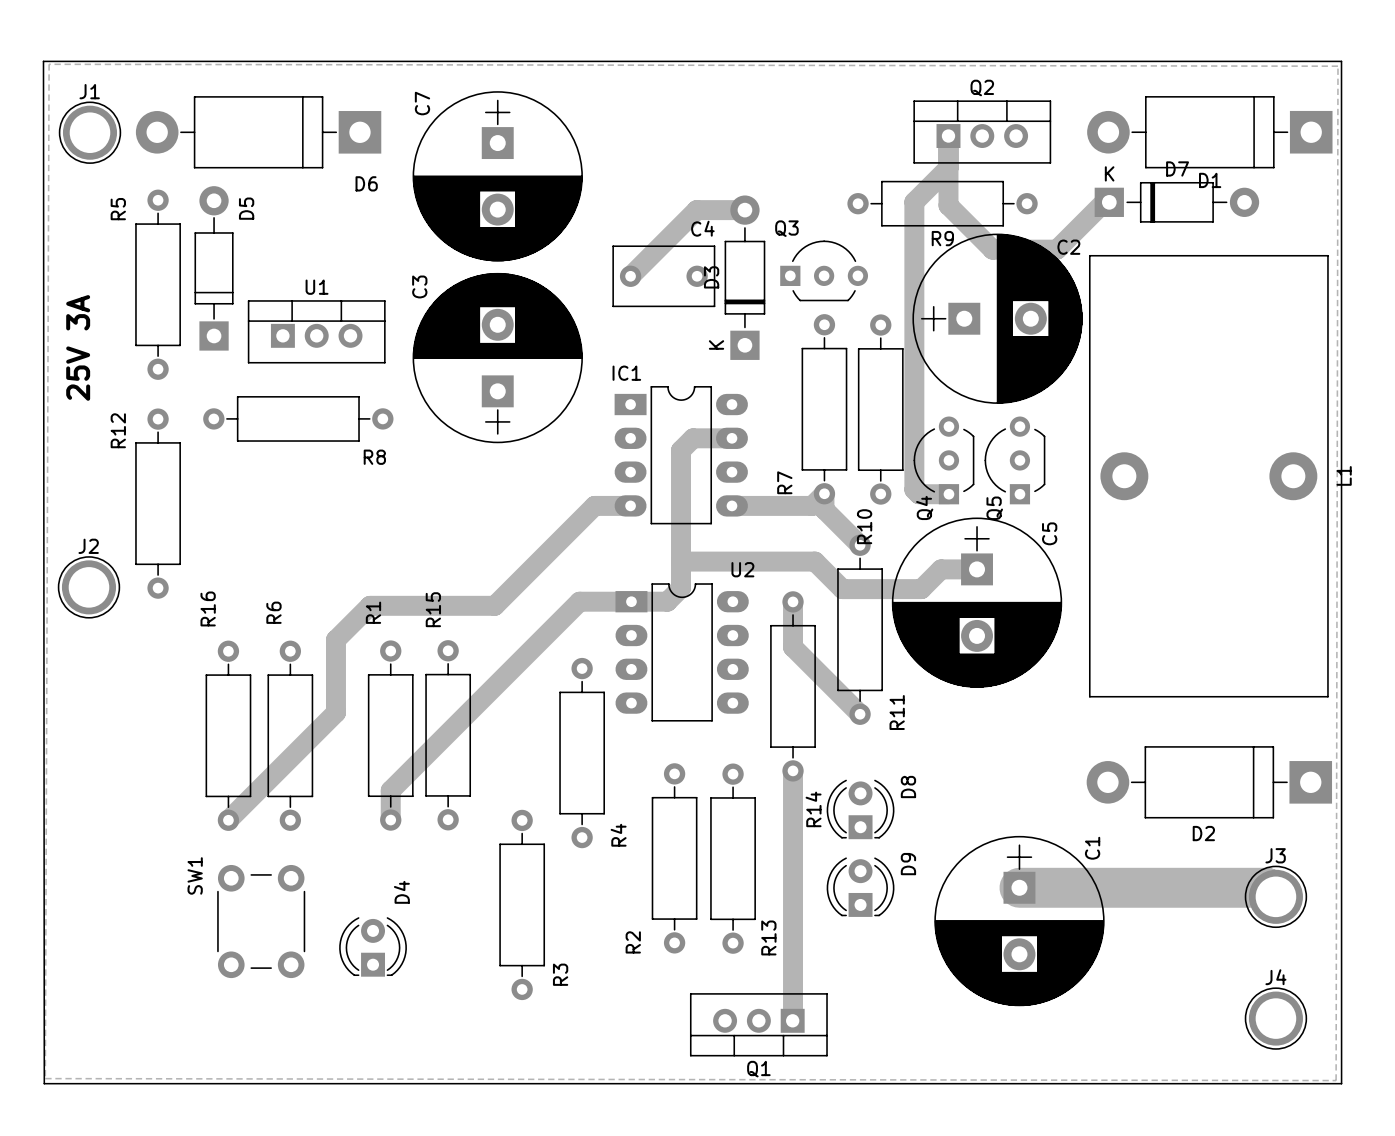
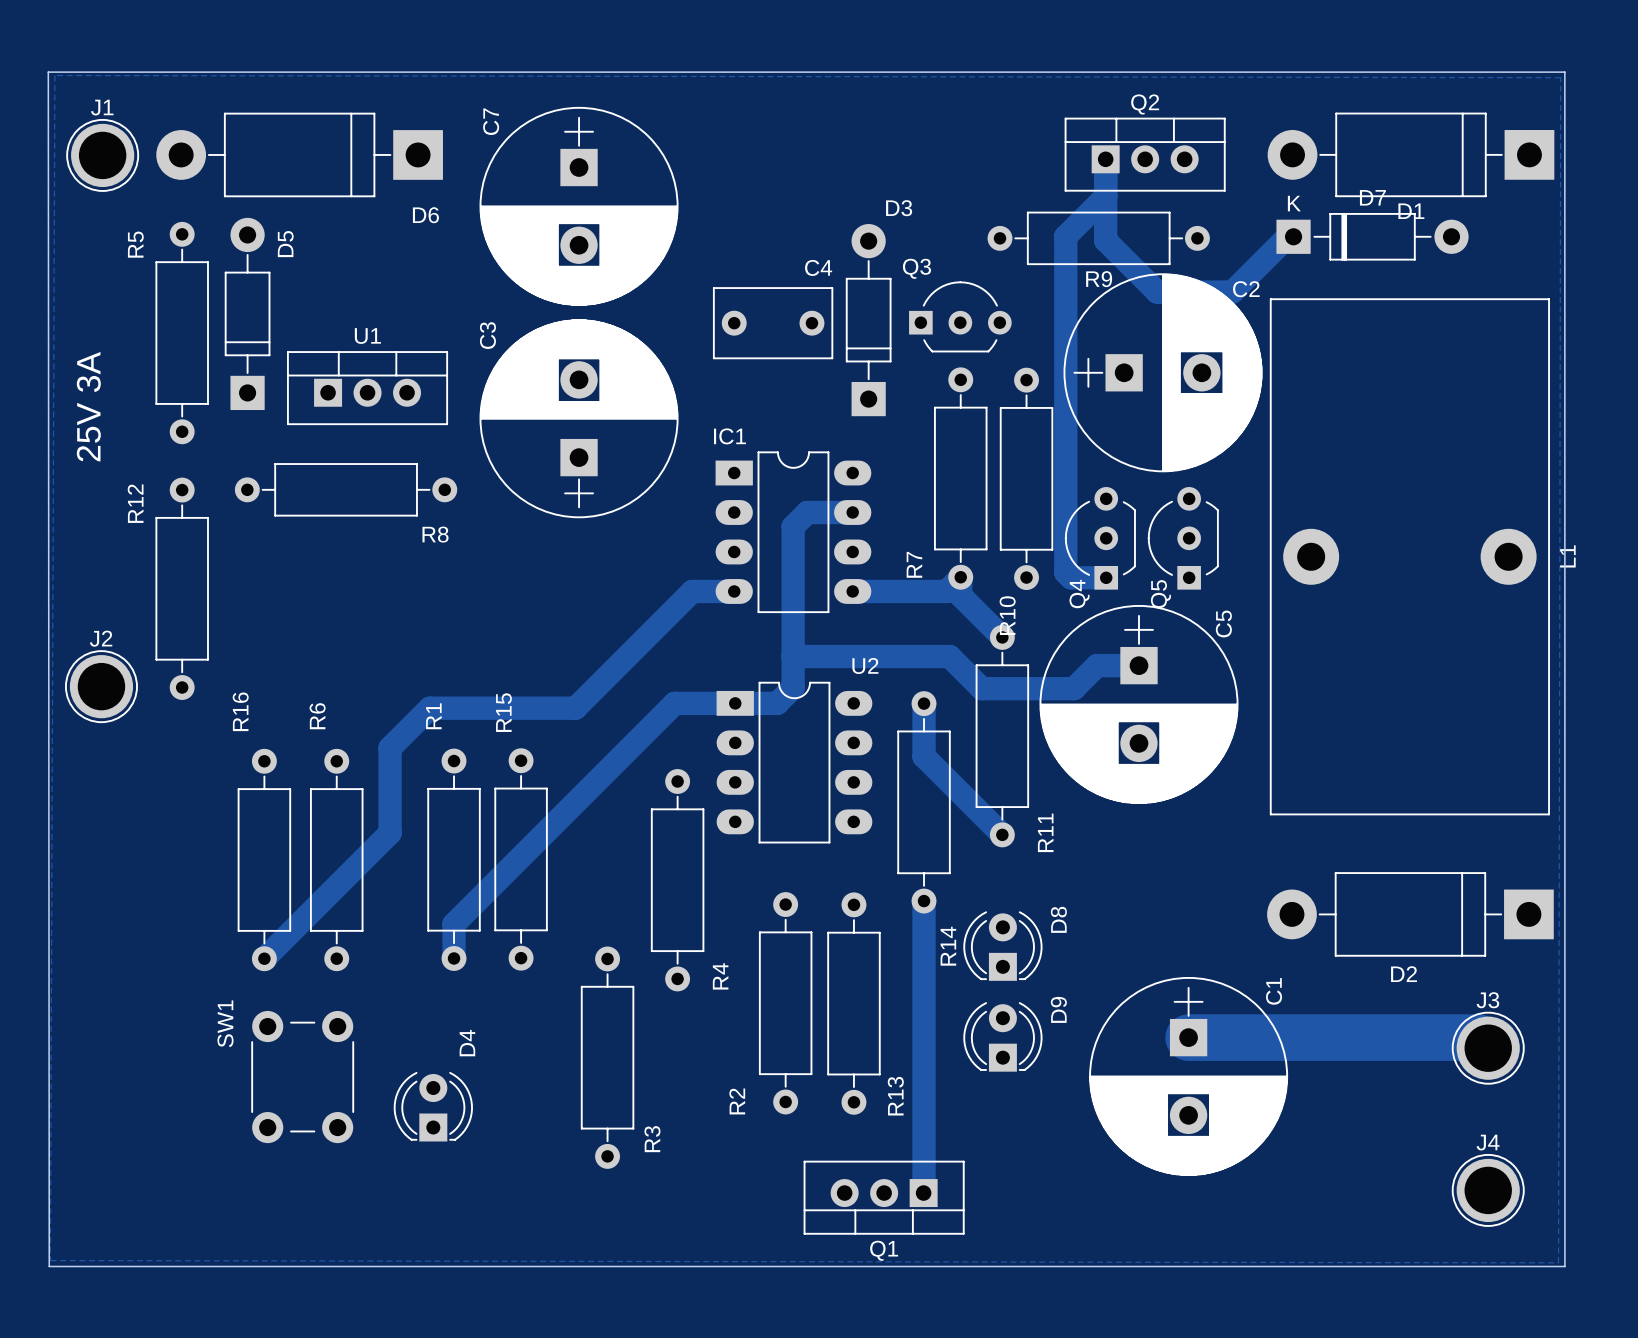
D3 footprint: [724, 195, 766, 360] -> [845, 224, 892, 417]
track: (744, 210) (696, 210) (630, 276) -> none
D3 name position: D3 (711, 277) -> D3 (899, 208)

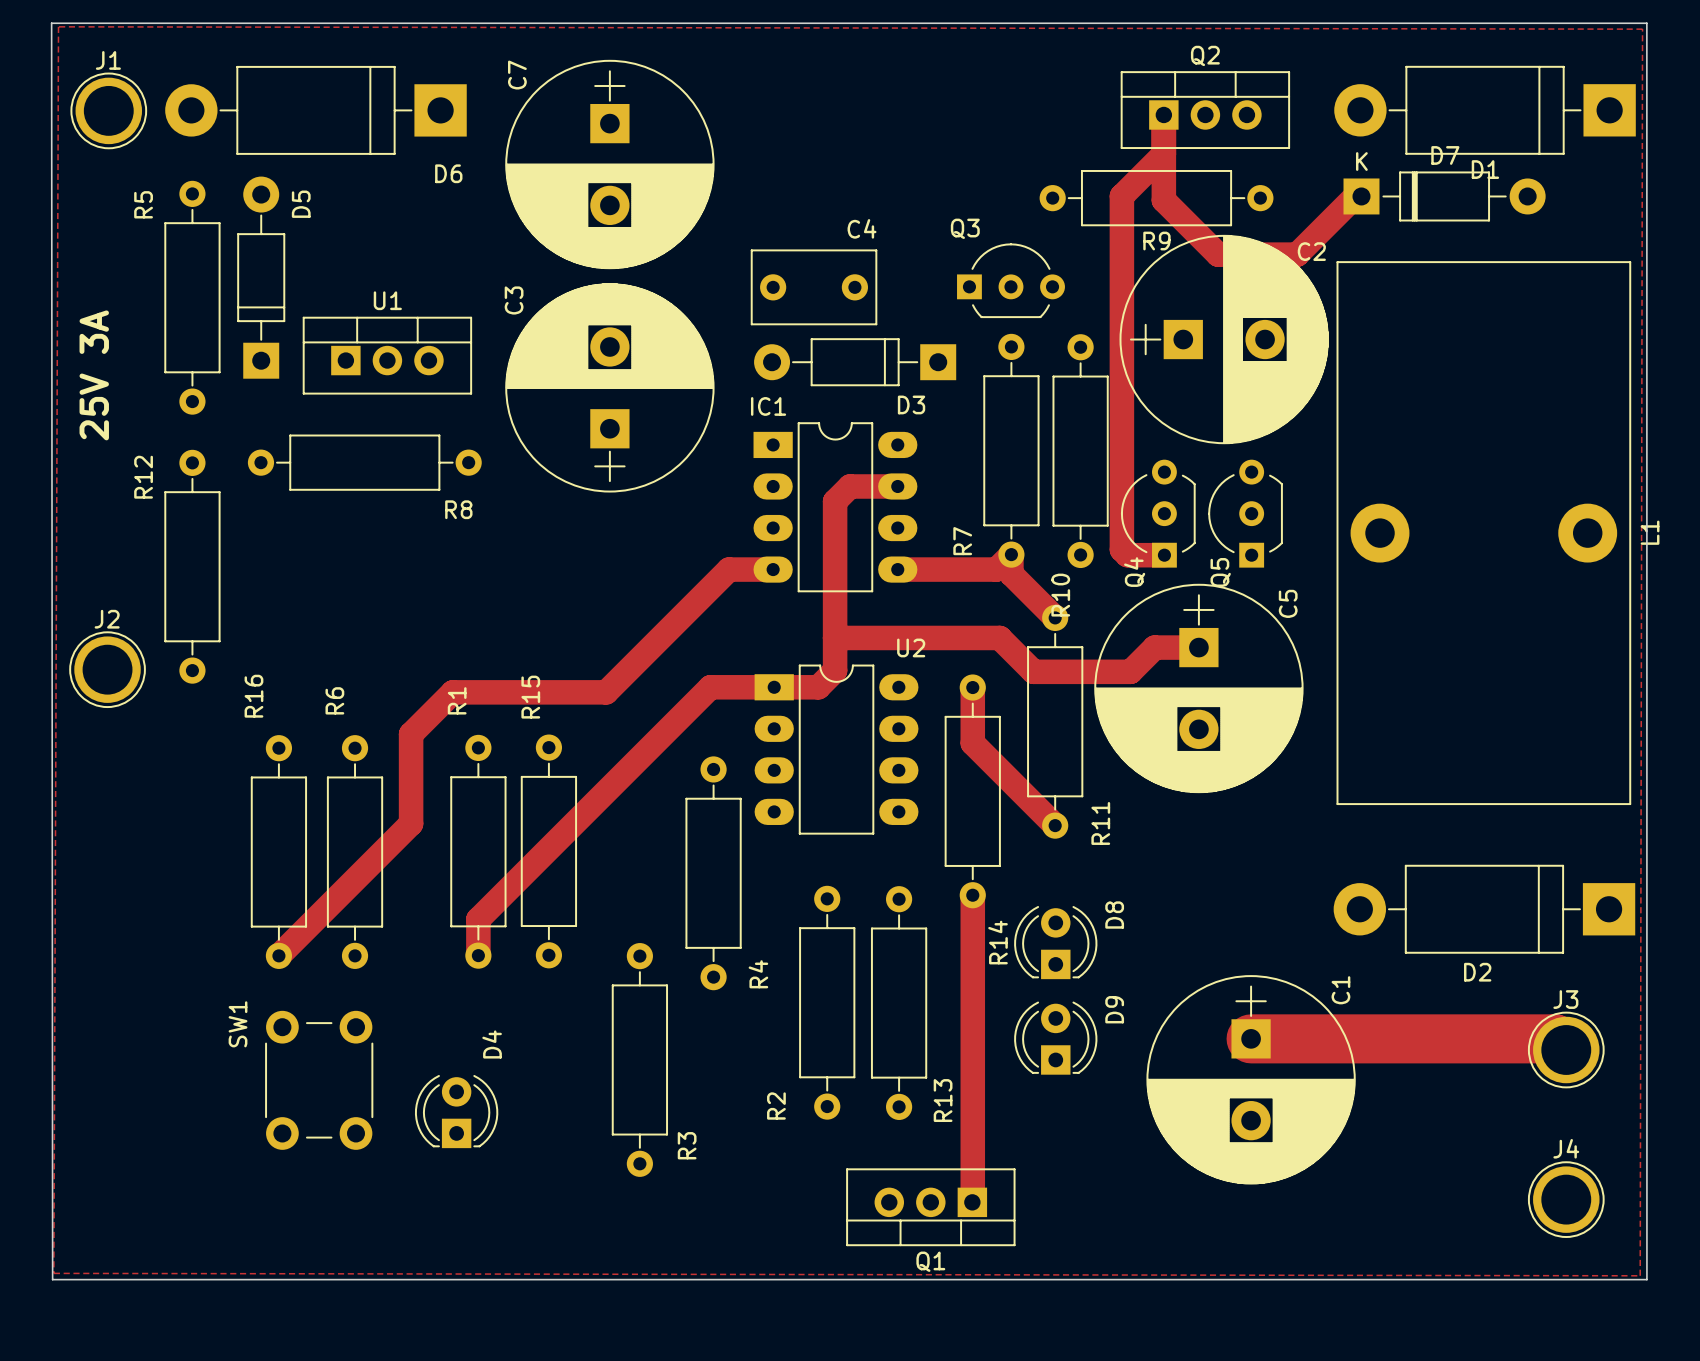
D3 name position: D3 (899, 208) -> D3 (911, 404)
D3 rotation: 0° (868, 320) -> 90° counterclockwise (855, 362)

